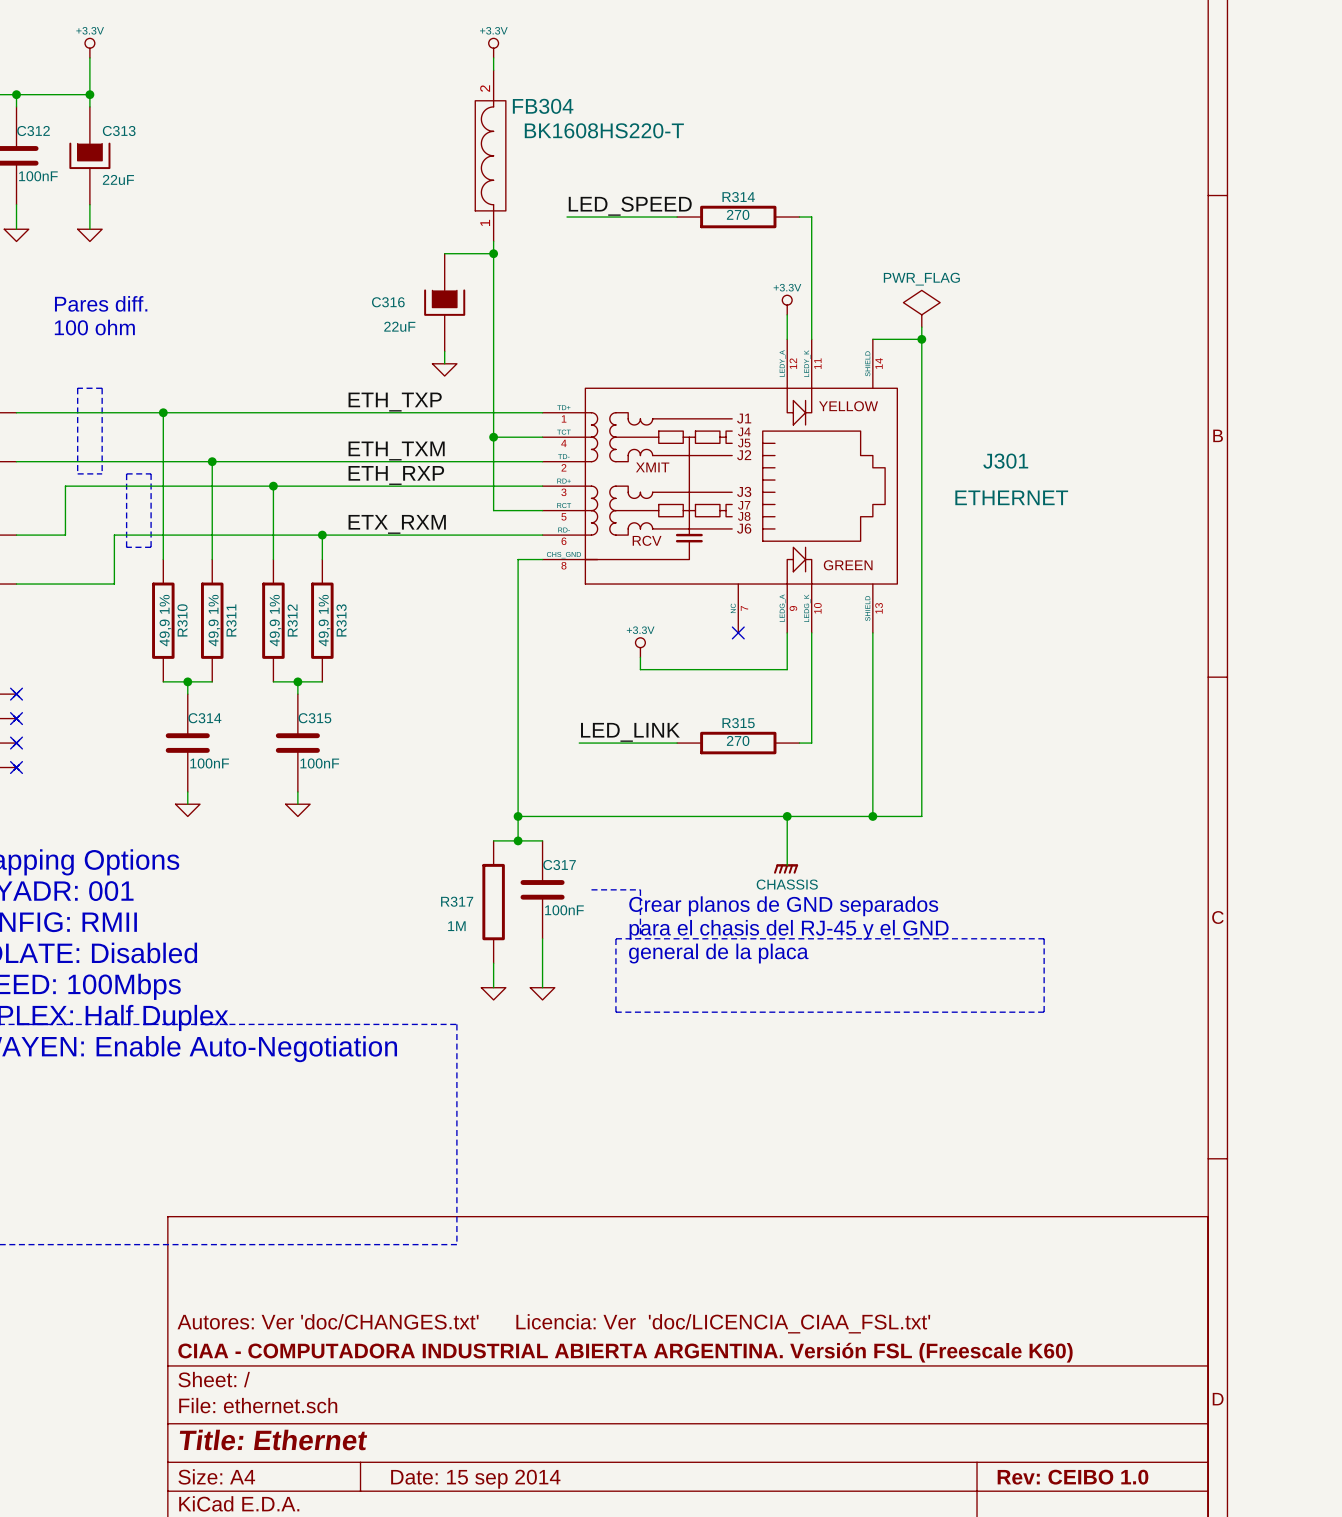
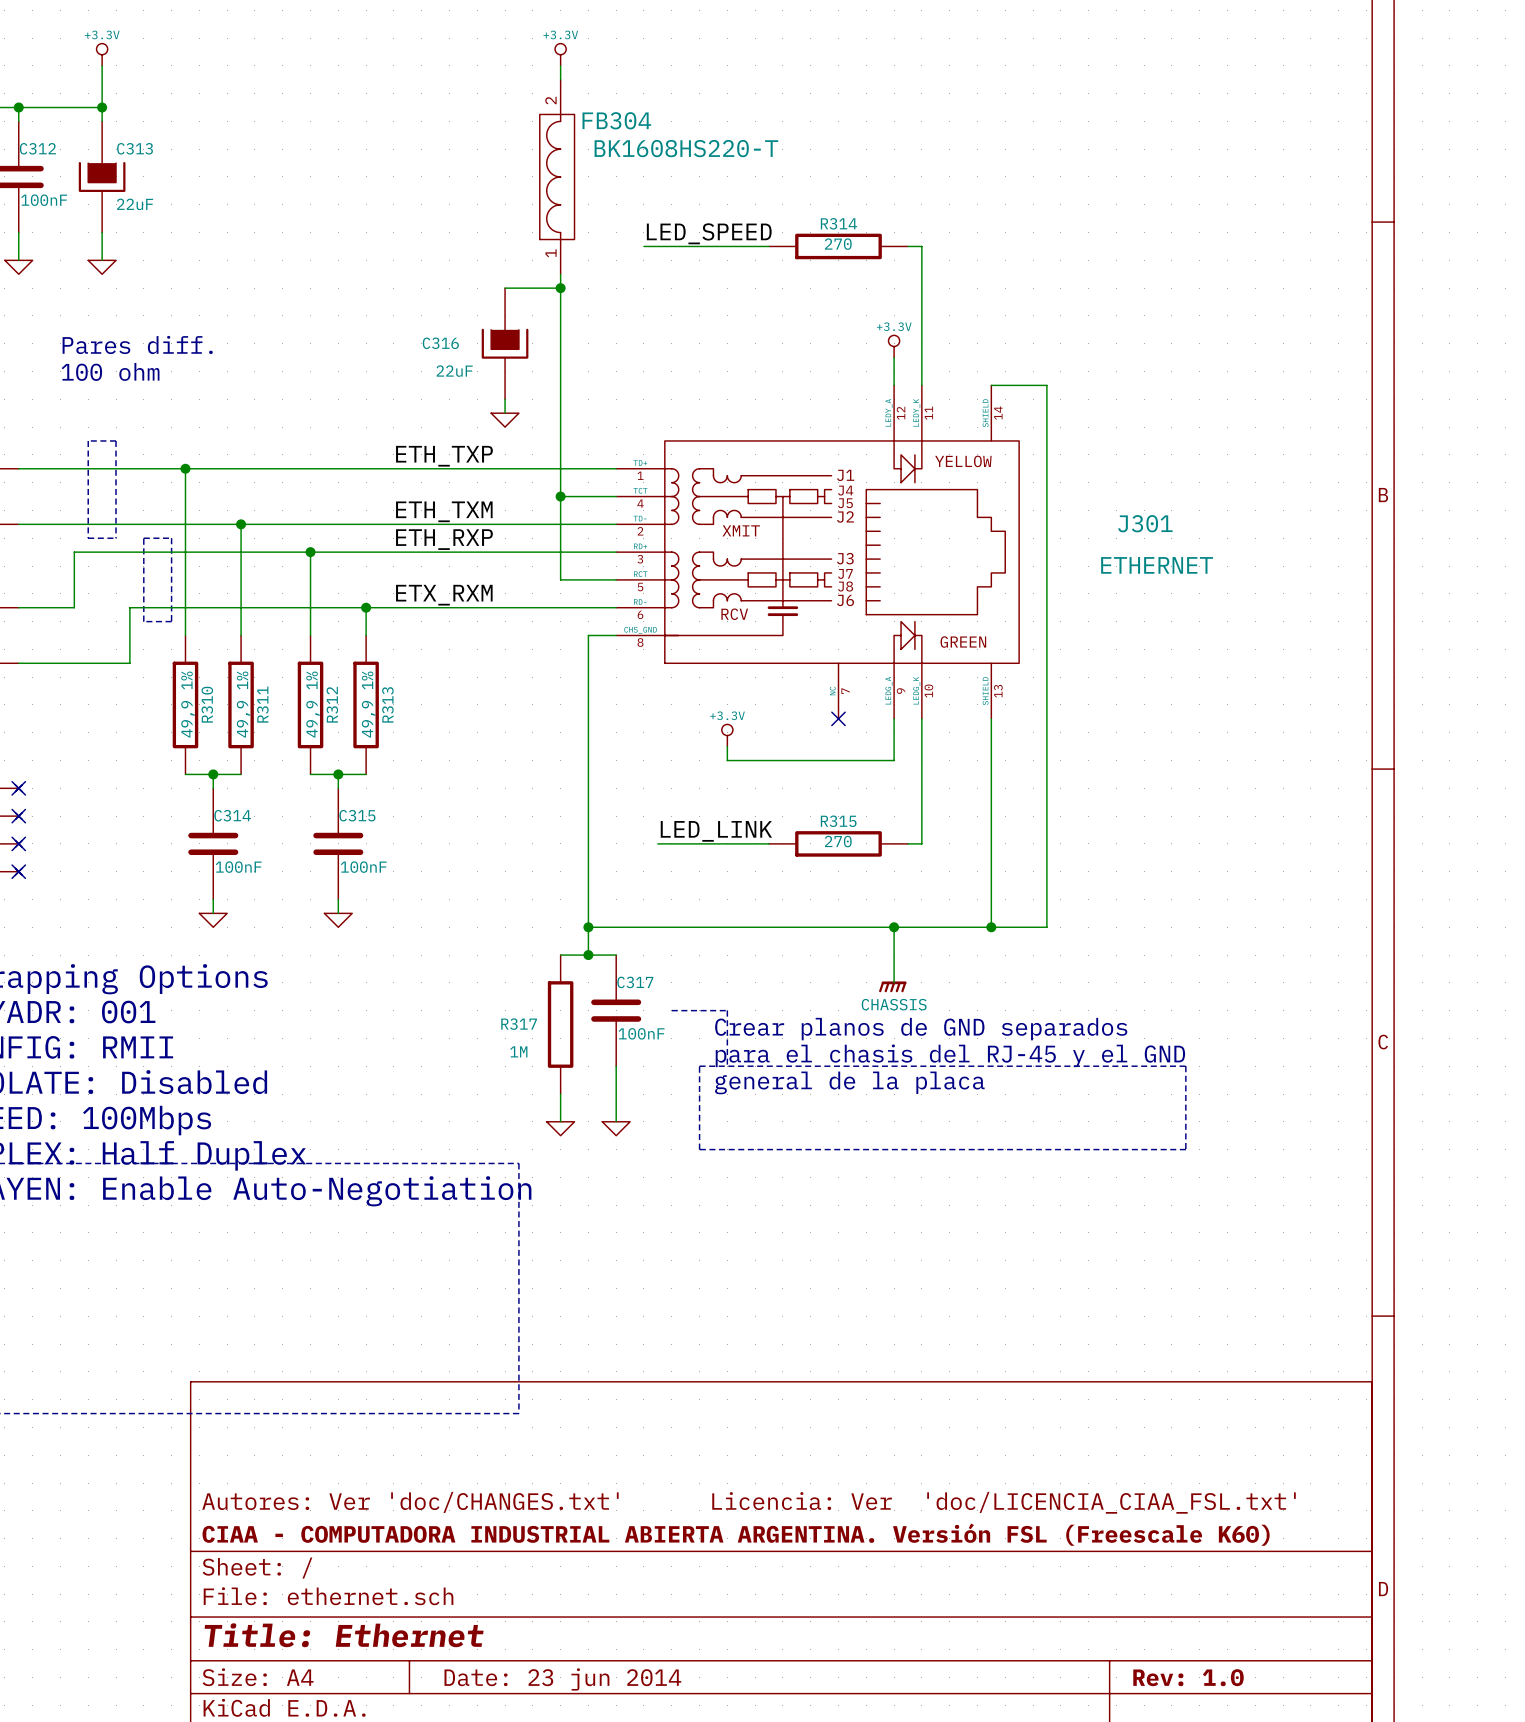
power symbol: PWR_FLAG (921, 308) -> none
wire: (921, 327) (921, 339) -> none
junction: (921, 339) -> none
title block: Rev: CEIBO 1.0 (1073, 1477) -> Rev: 1.0 (1188, 1677)
title block: Date: 15 sep 2014 (475, 1479) -> Date: 23 jun 2014 (562, 1679)

